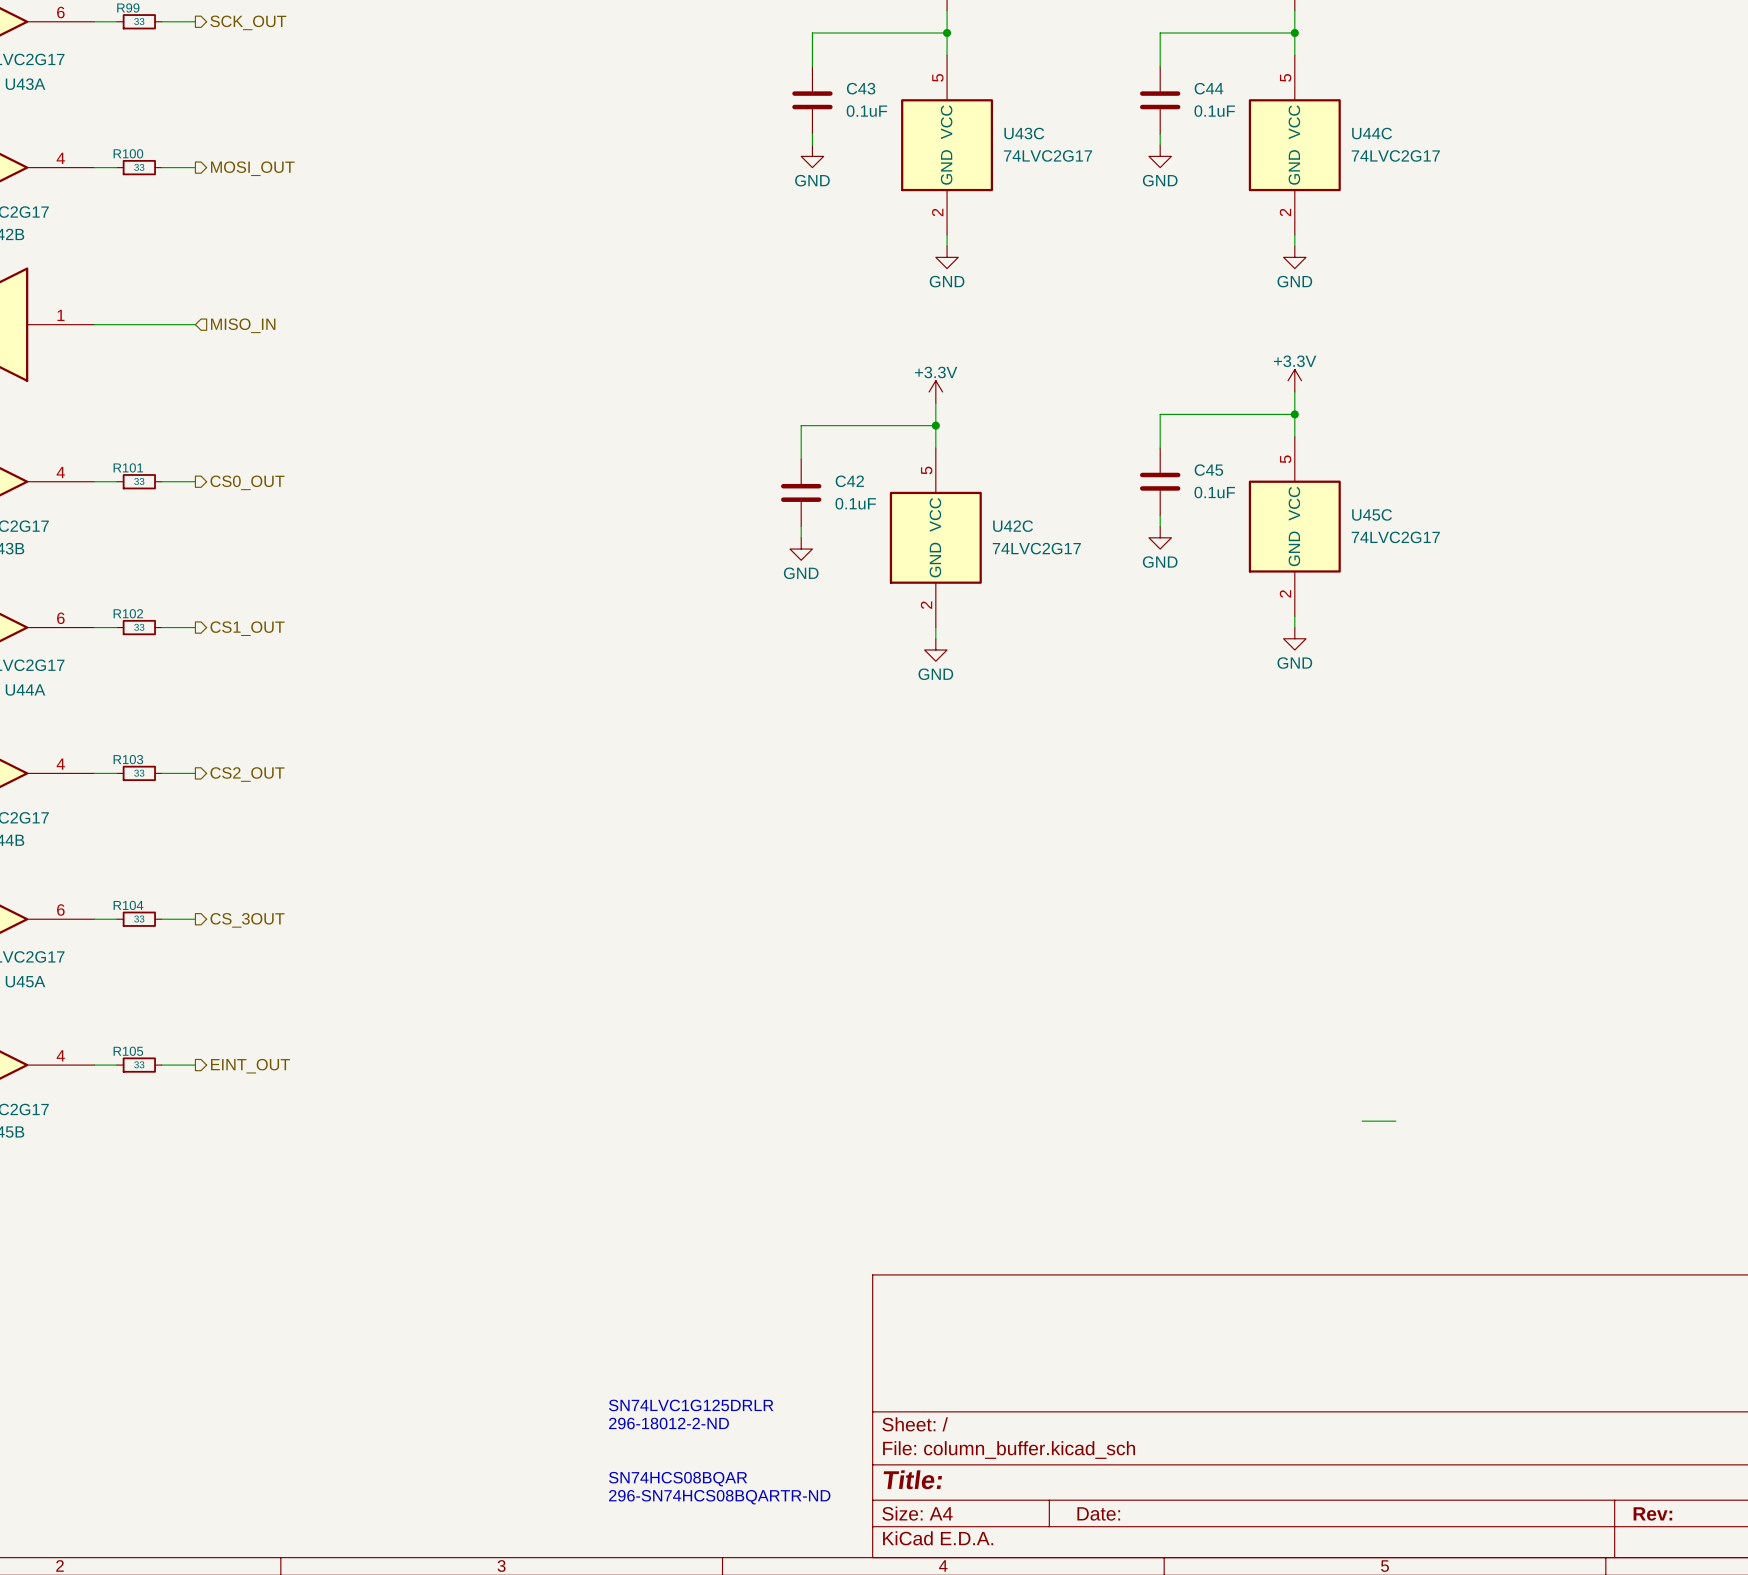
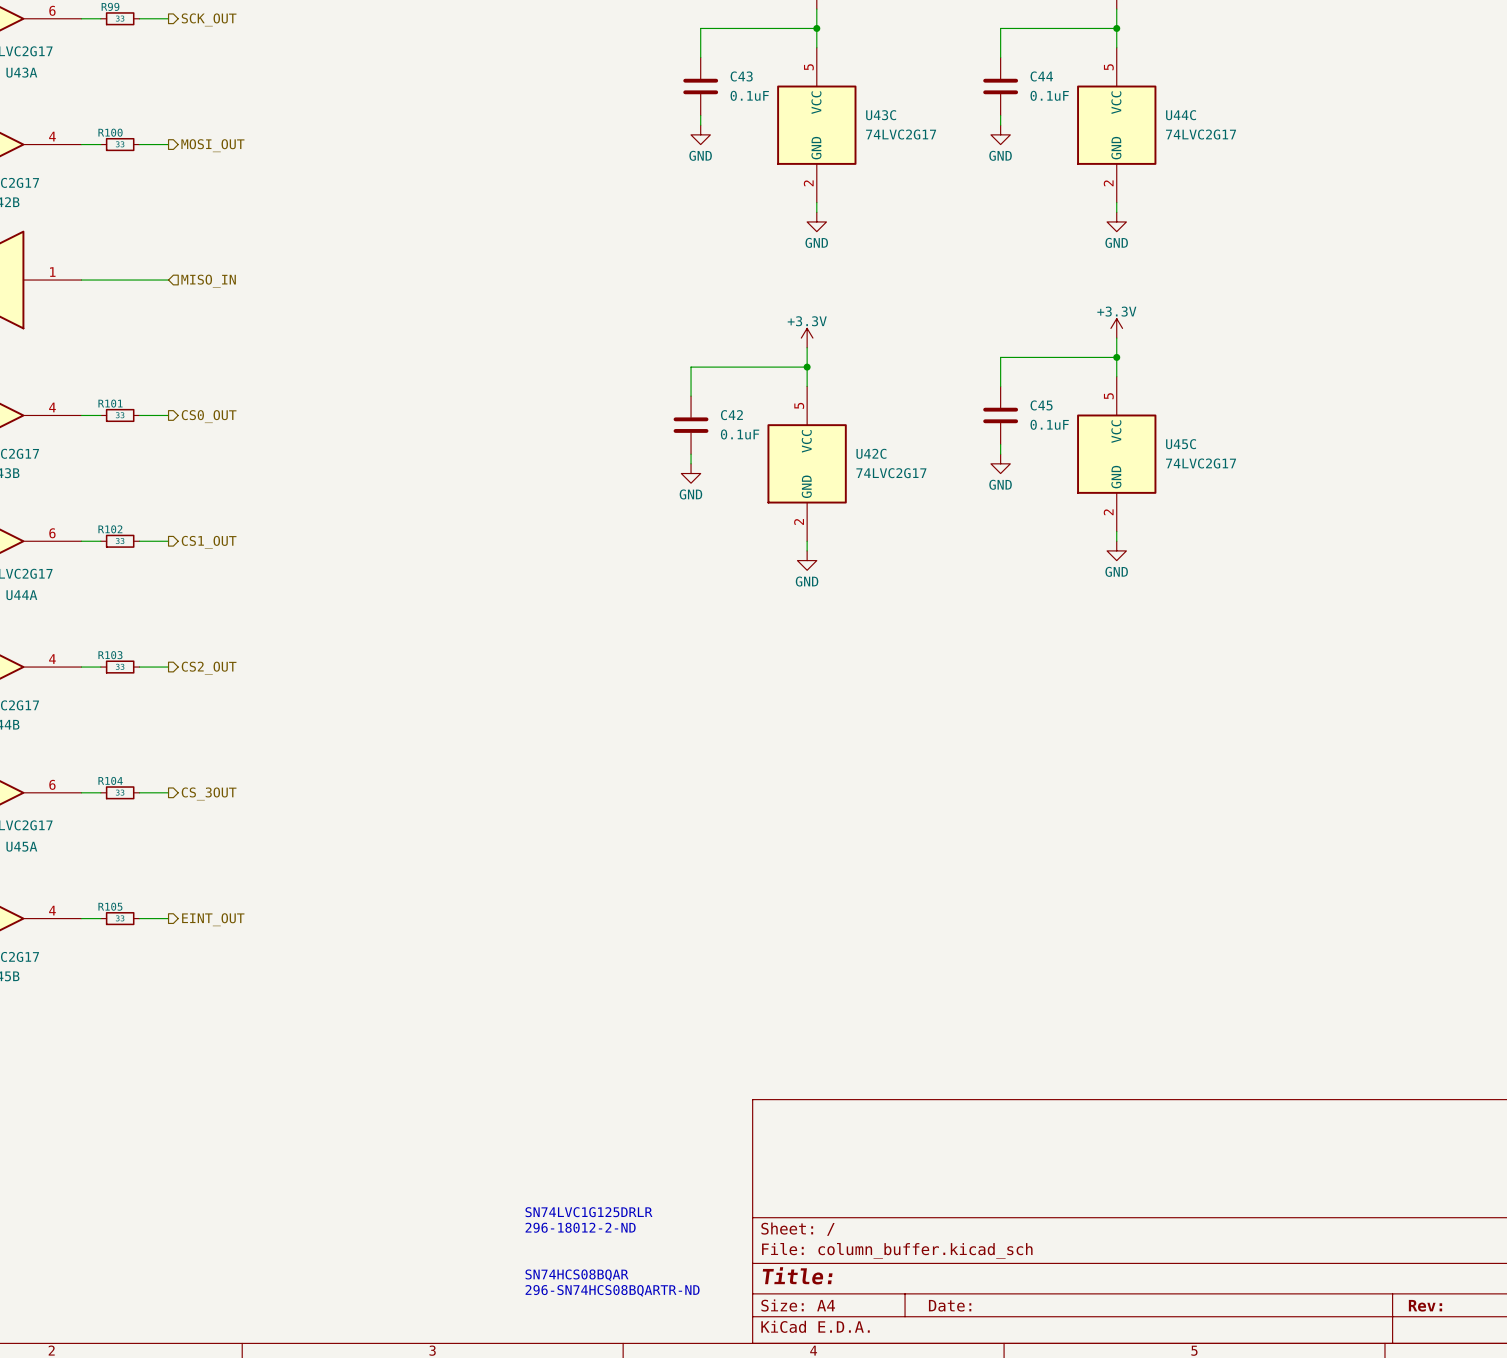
wire: (1362, 1121) (1395, 1121) -> none

